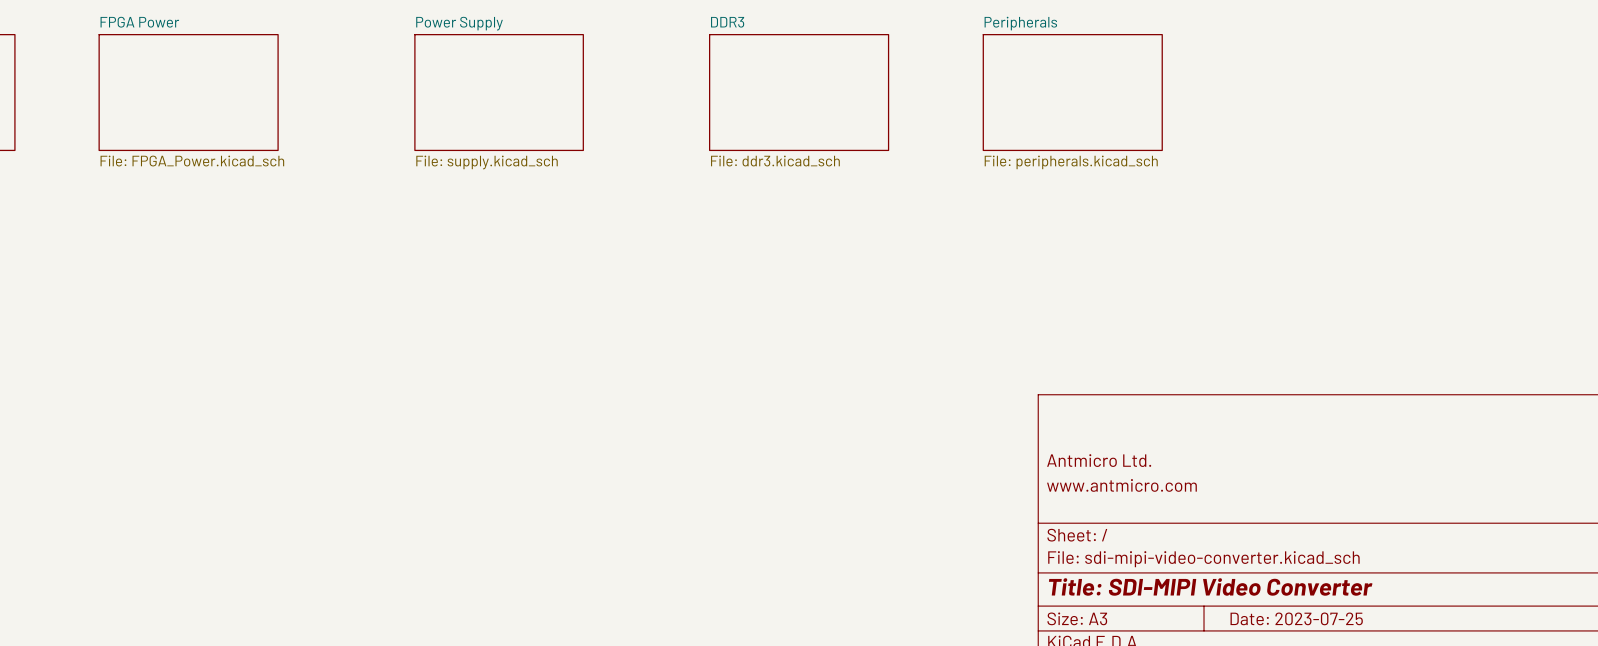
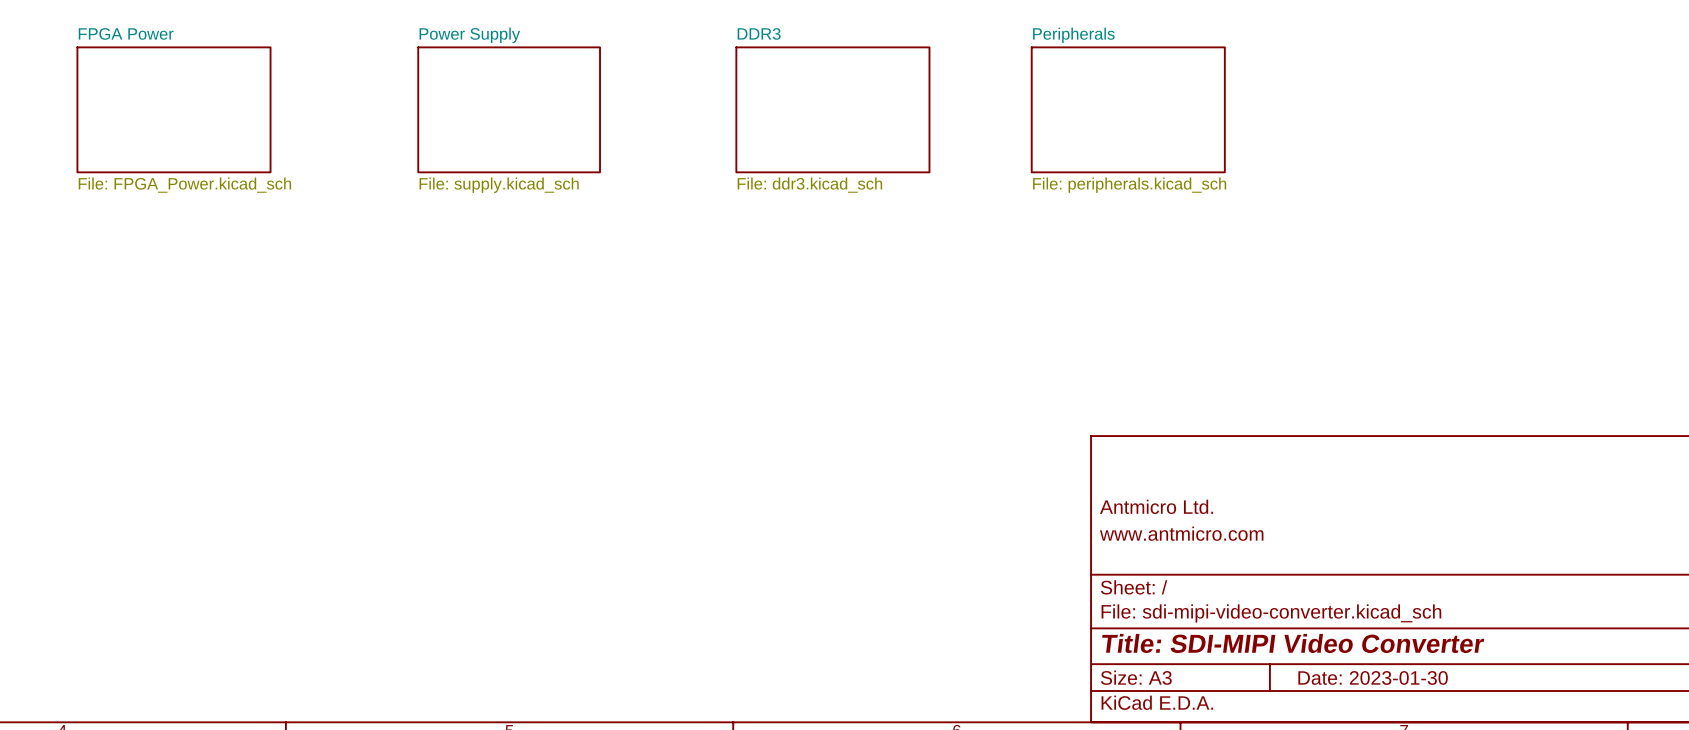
title block: Date: 2023-07-25 (1296, 618) -> Date: 2023-01-30 (1373, 677)

